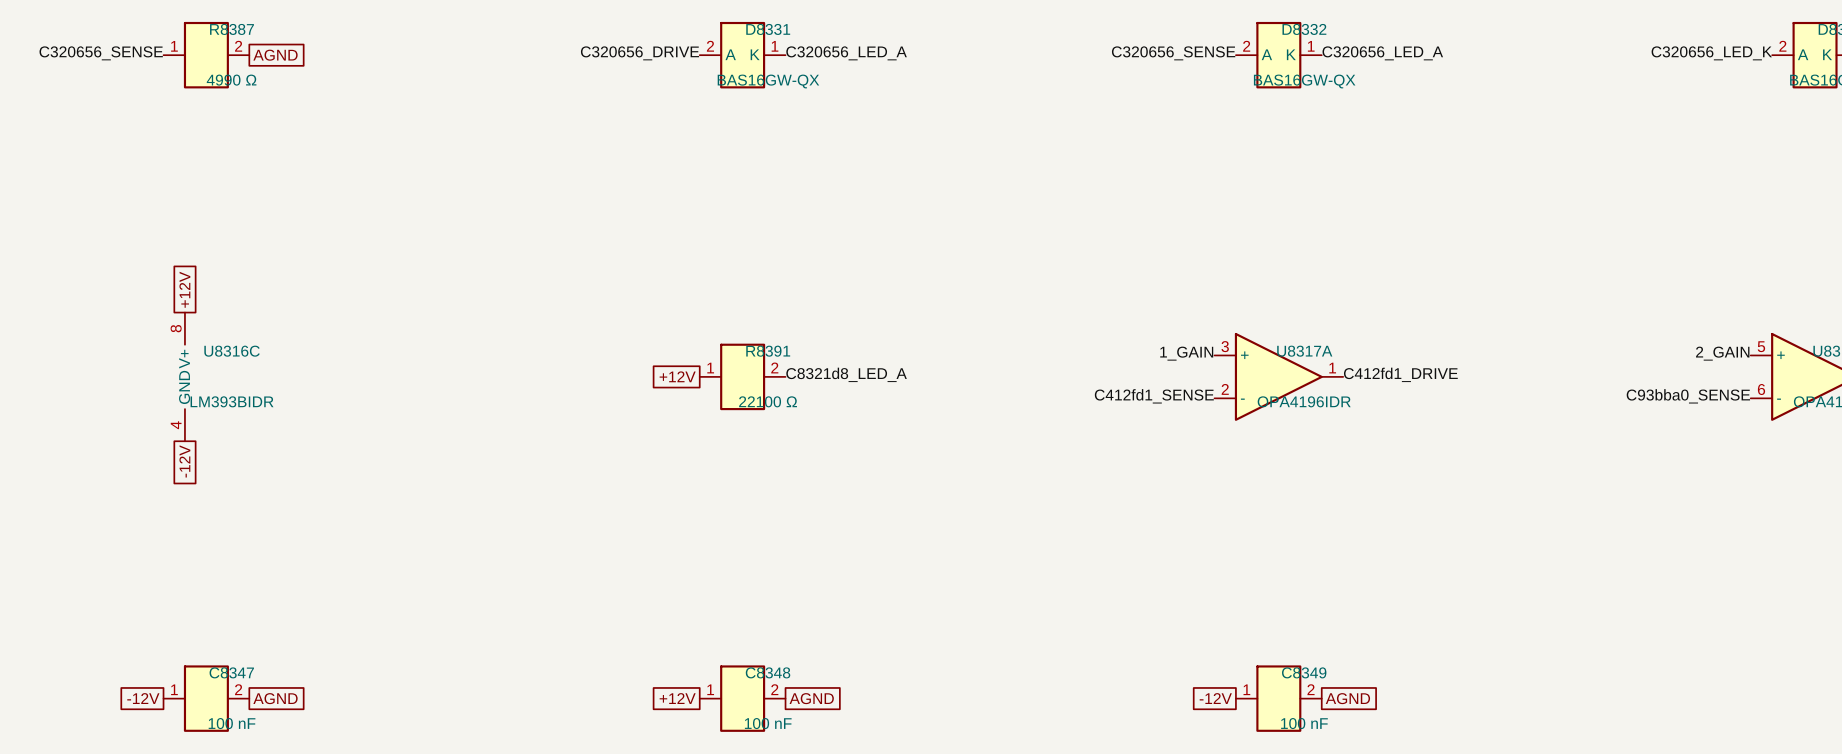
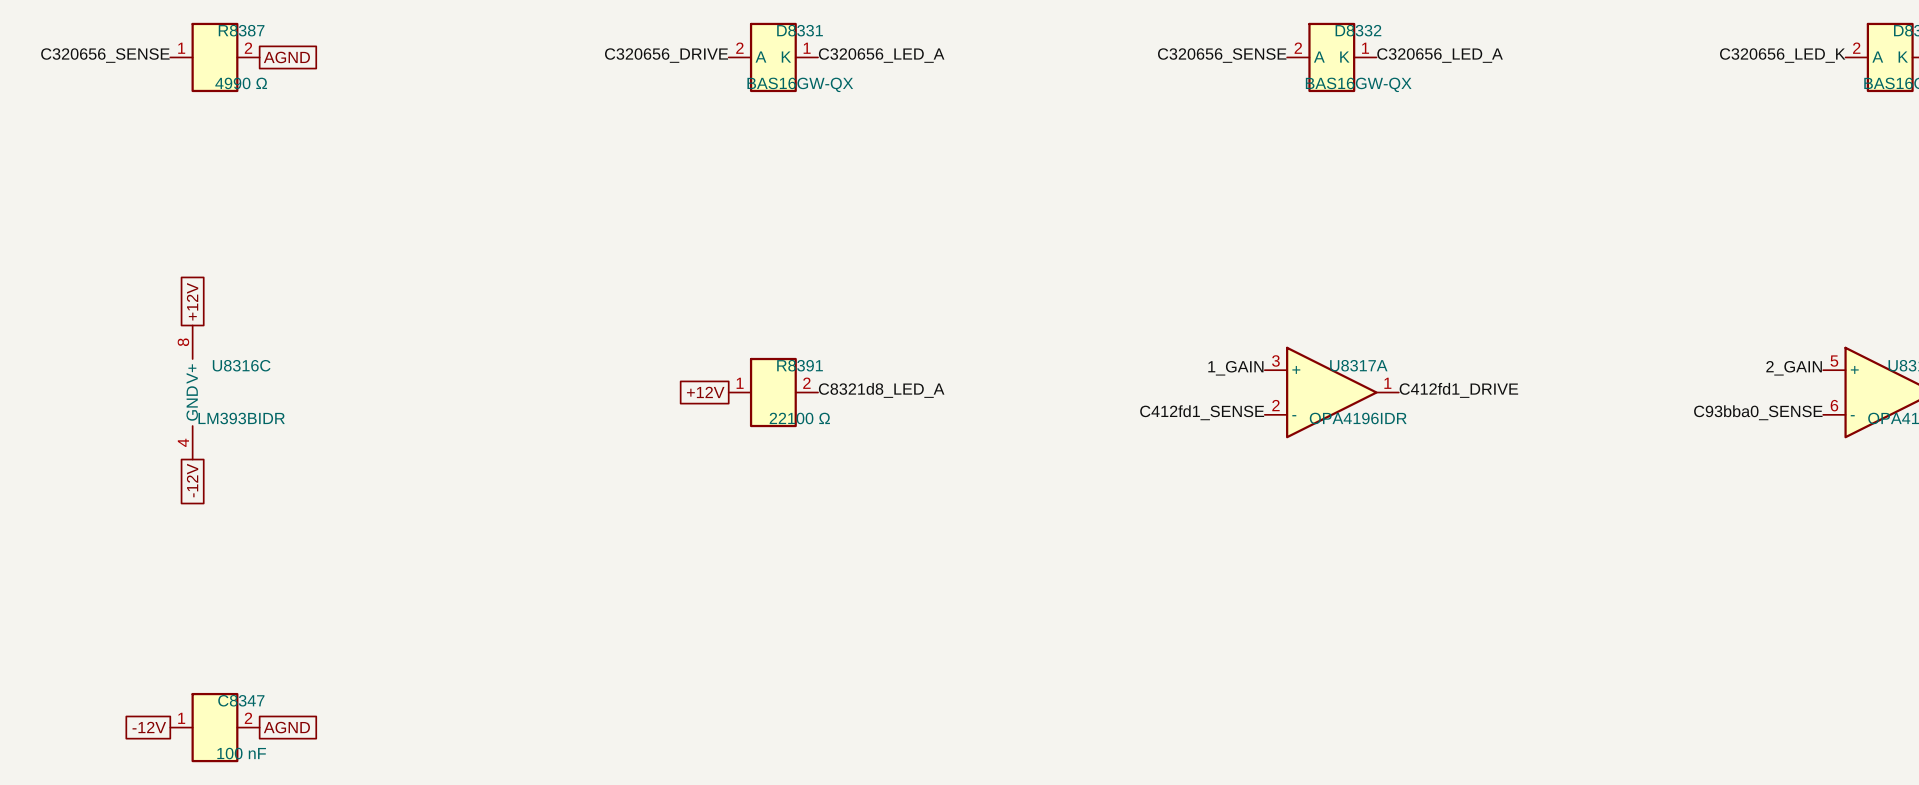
global label: +12V (677, 698) -> none
C8348: 100 nF (742, 698) -> none
global label: AGND (811, 698) -> none
global label: -12V (1215, 698) -> none
C8349: 100 nF (1278, 698) -> none
global label: AGND (1347, 698) -> none

